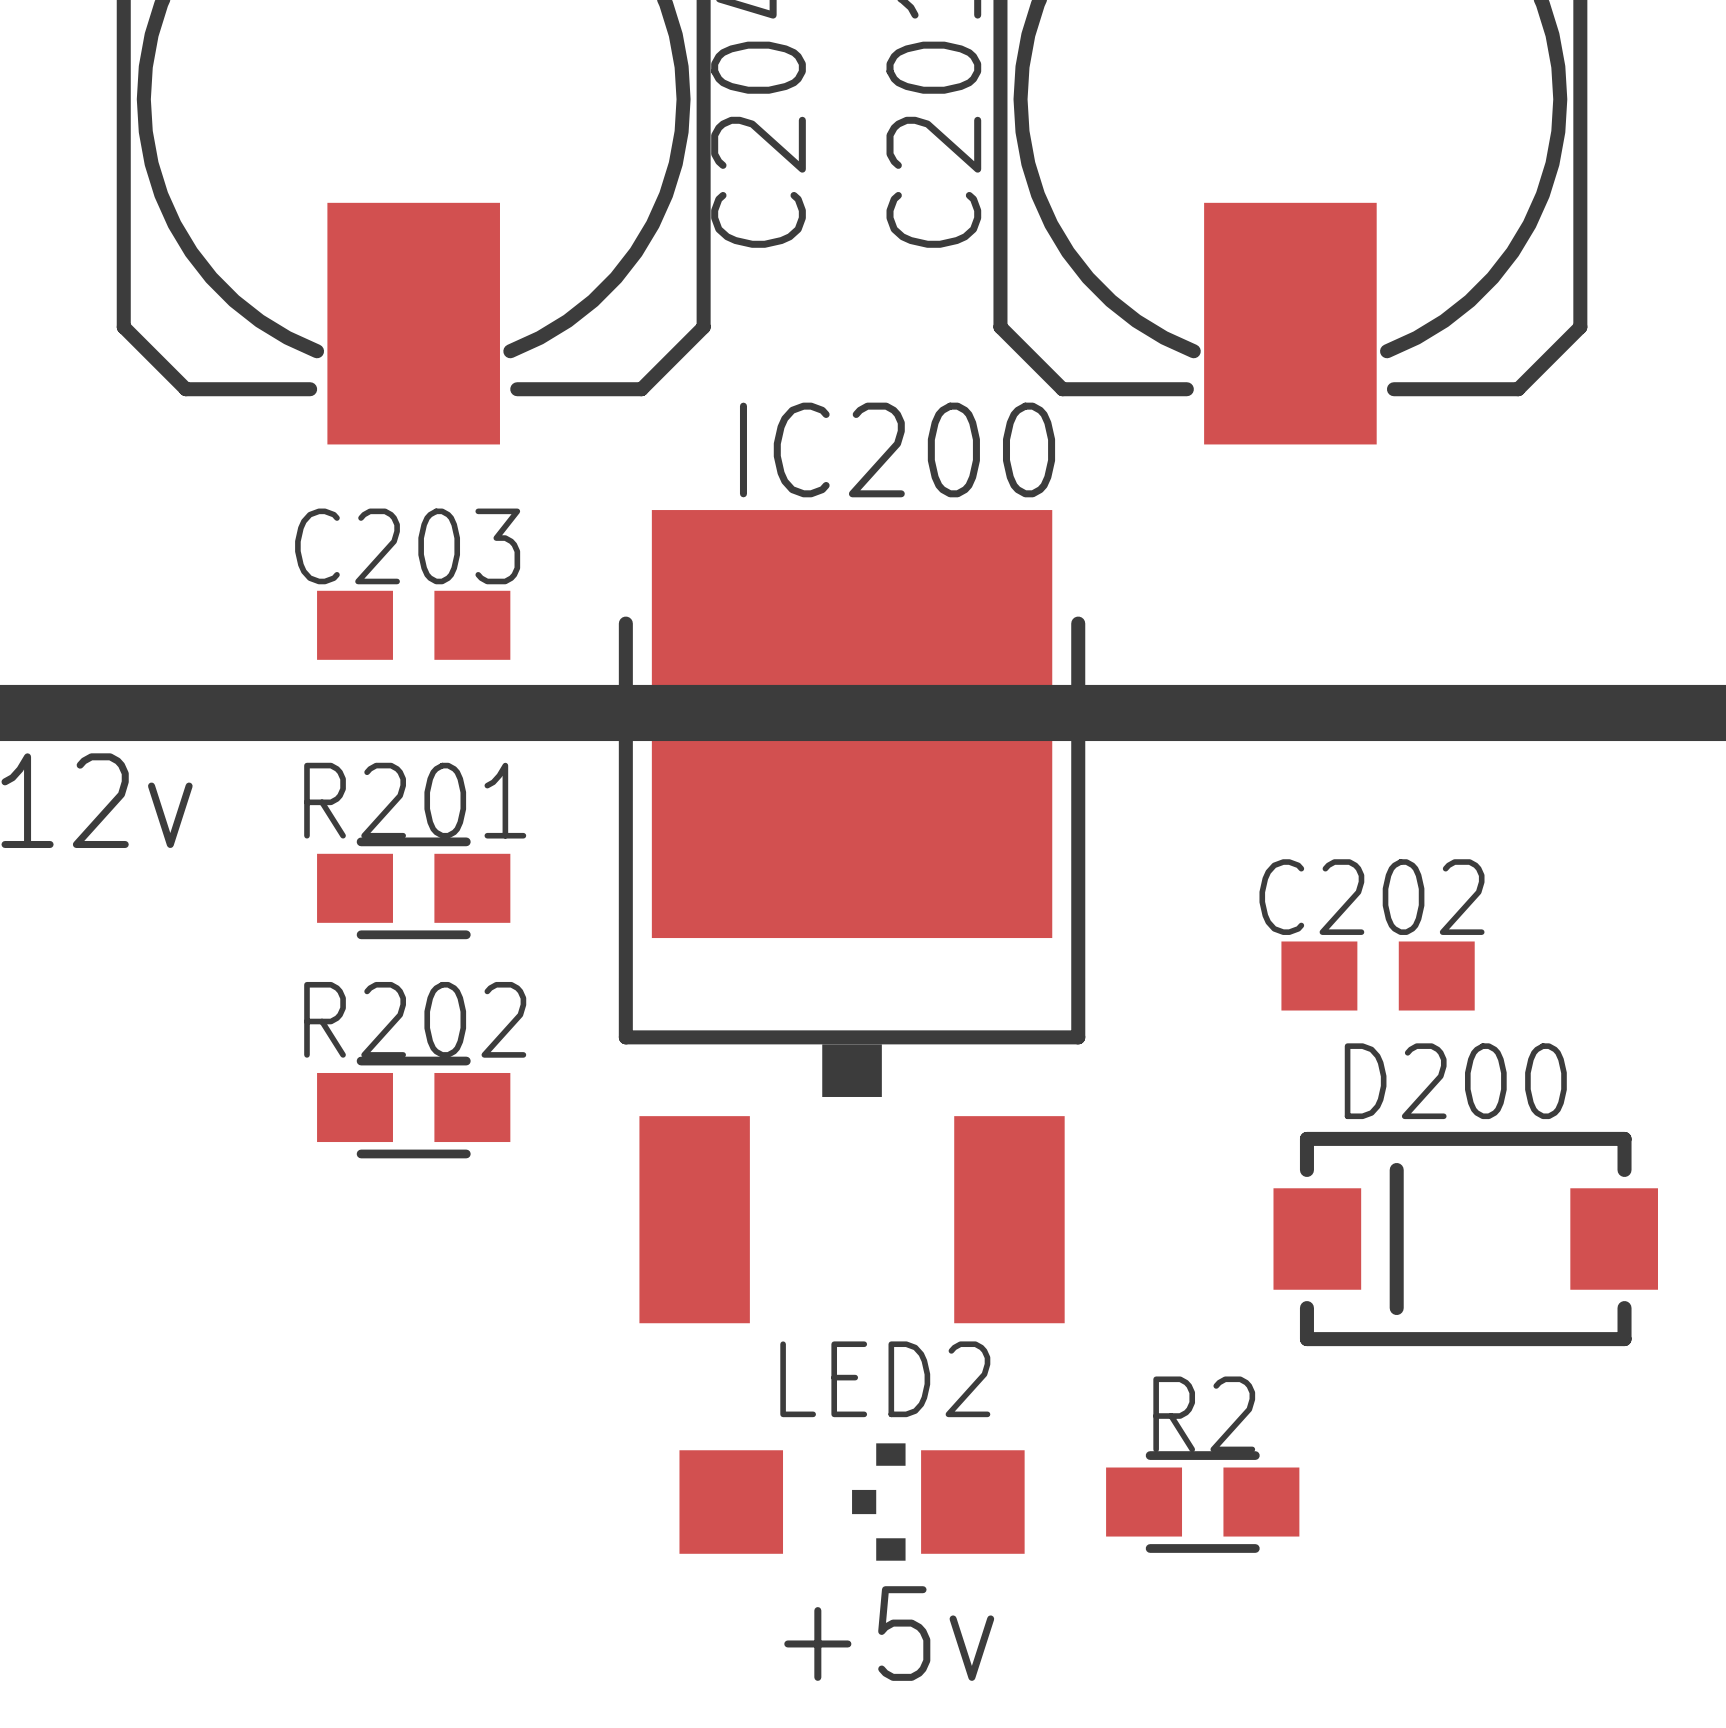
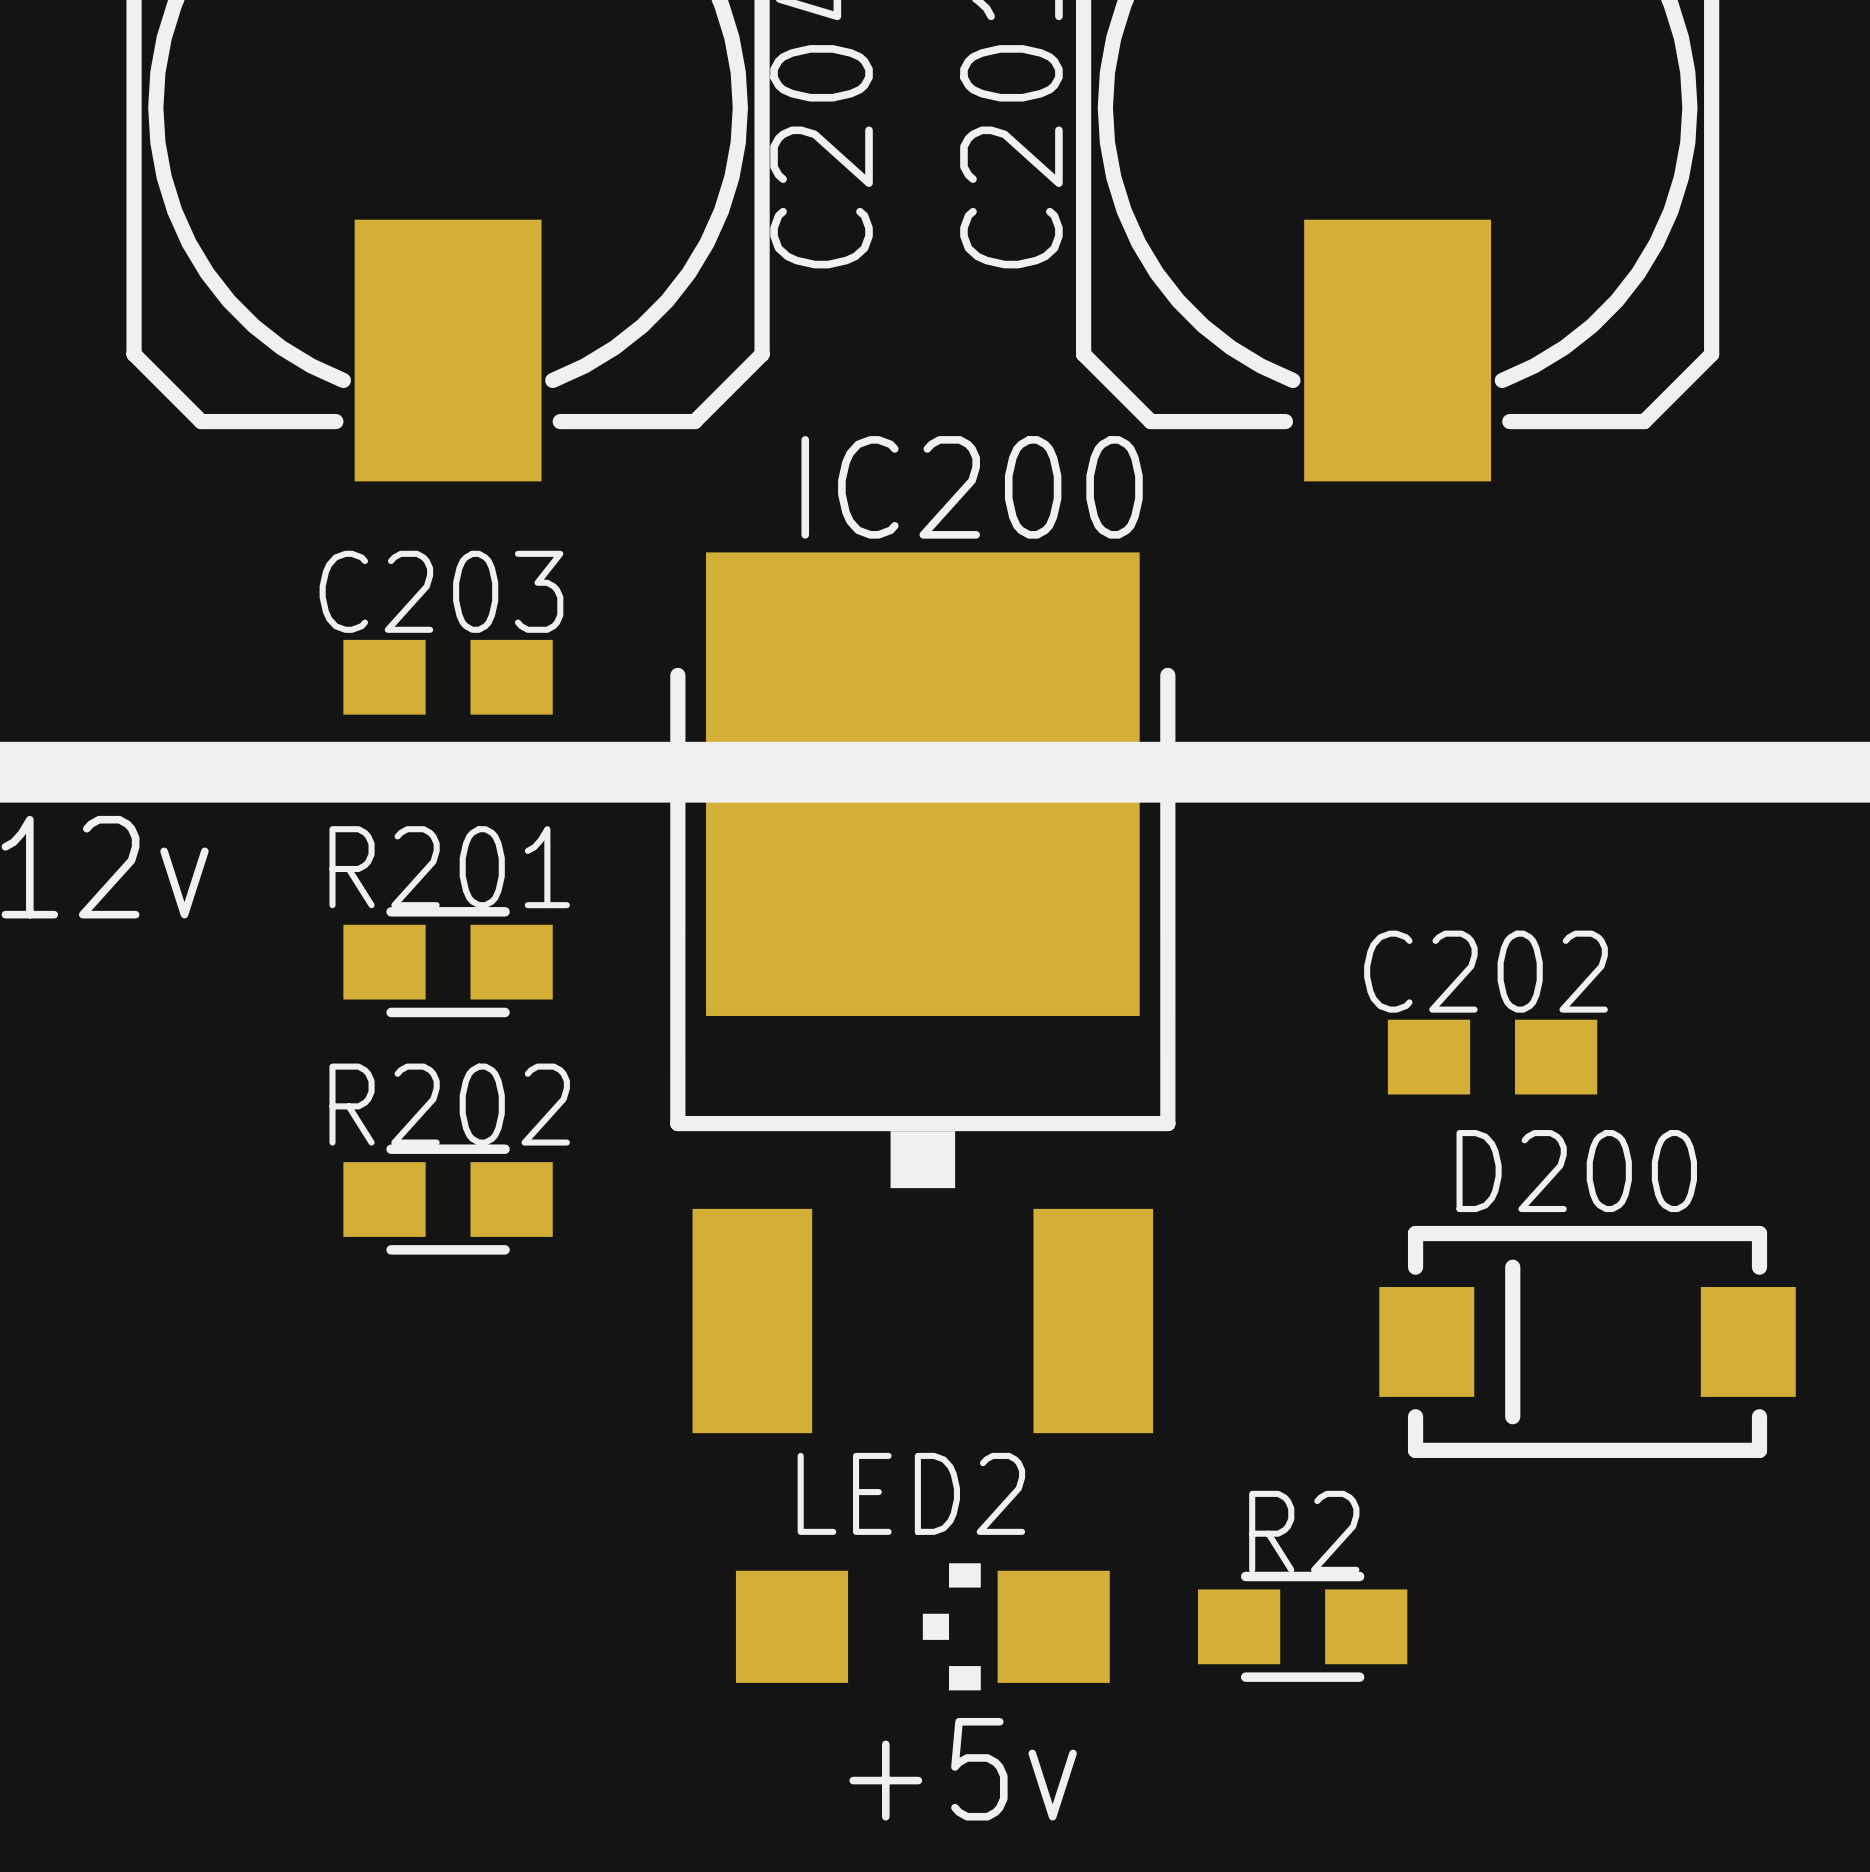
LED2 name position: LED2 (885, 1379) -> LED2 (911, 1493)

